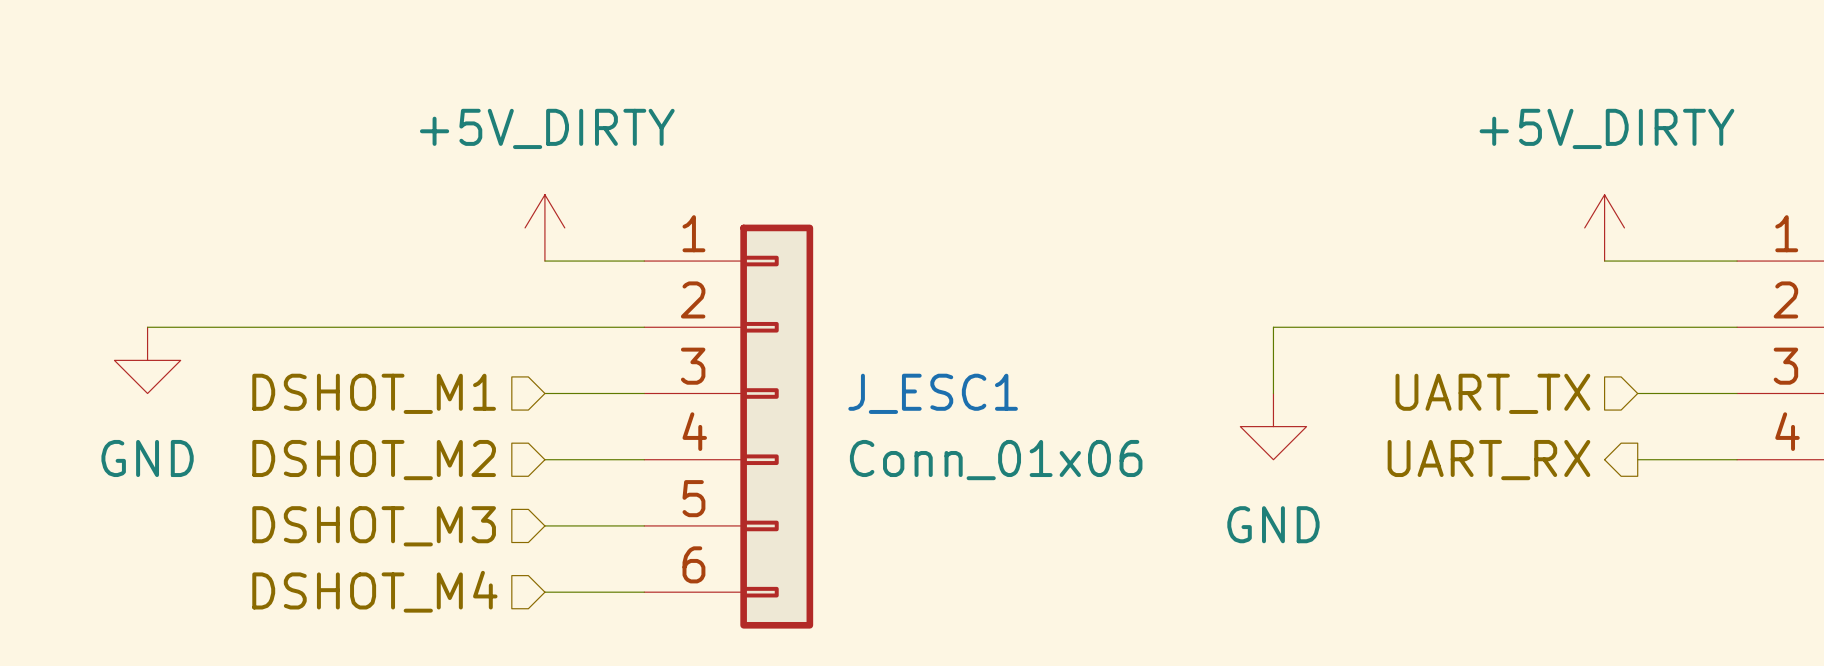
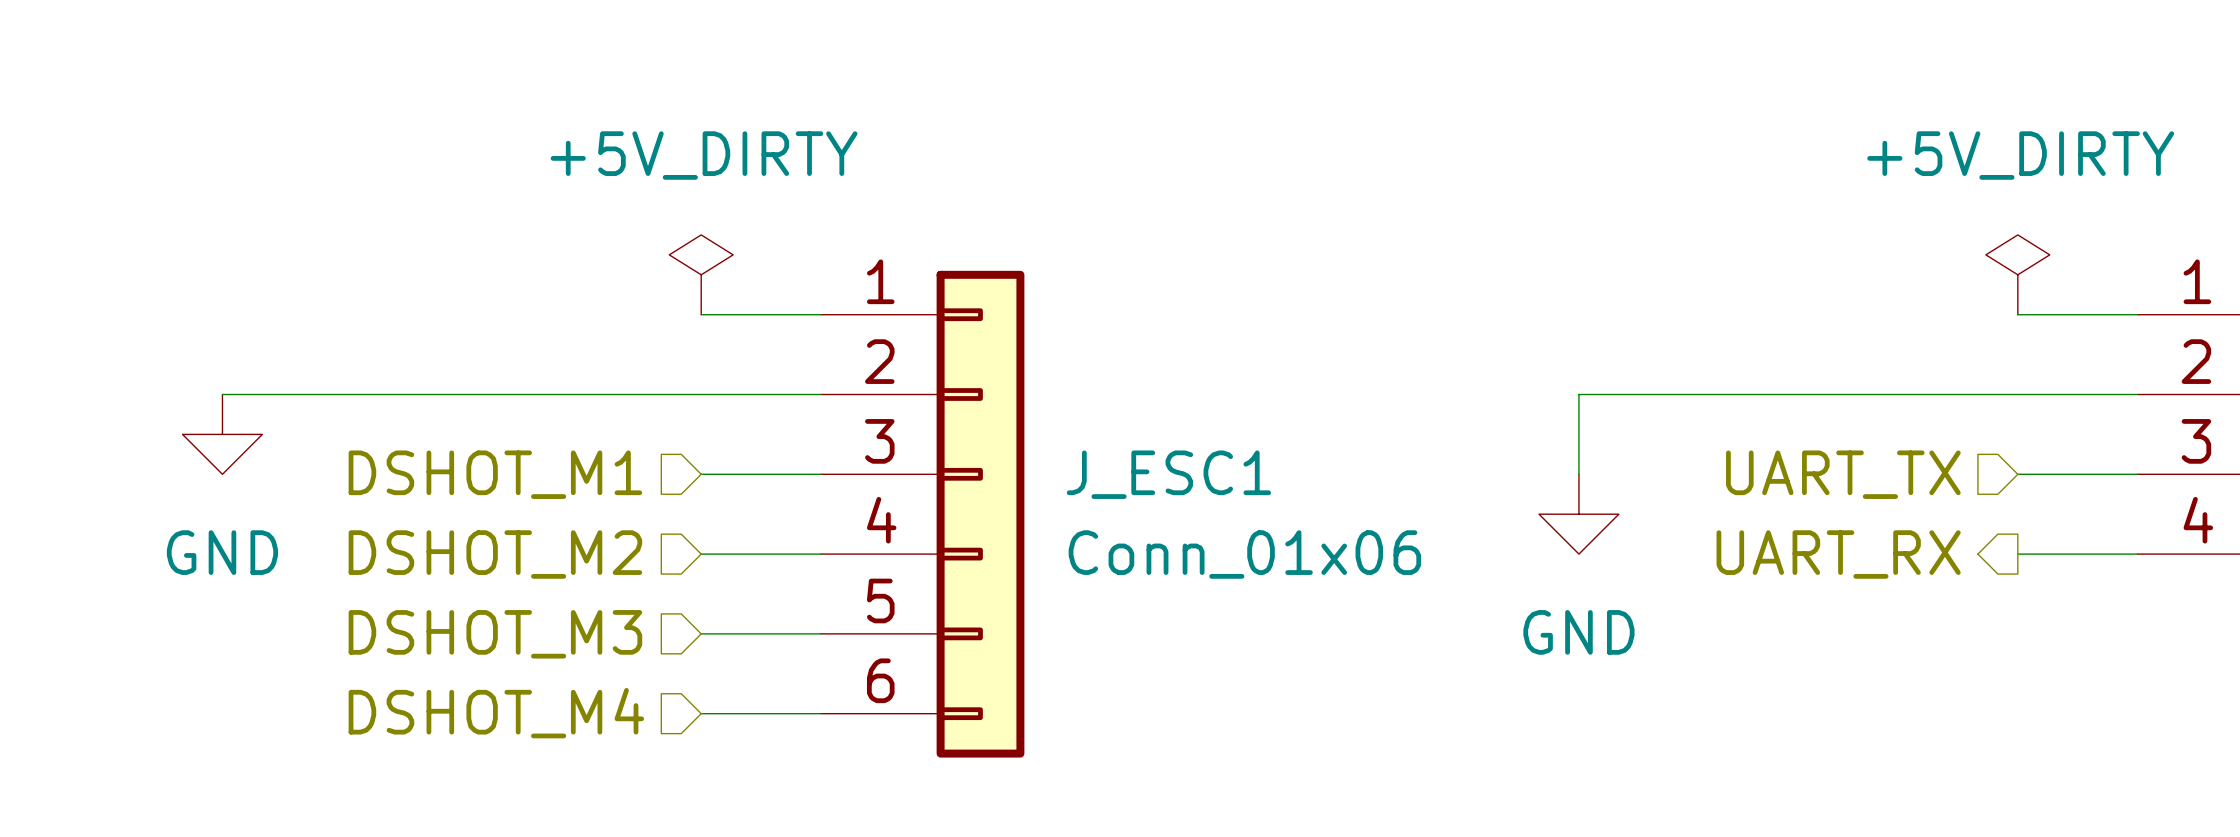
power symbol shape: [525, 194, 565, 262] -> [669, 234, 734, 315]
power symbol: +5V_DIRTY (1604, 227) -> none
power symbol: none -> +5V_DIRTY (2017, 274)
wire: (1604, 261) (1637, 261) -> none

